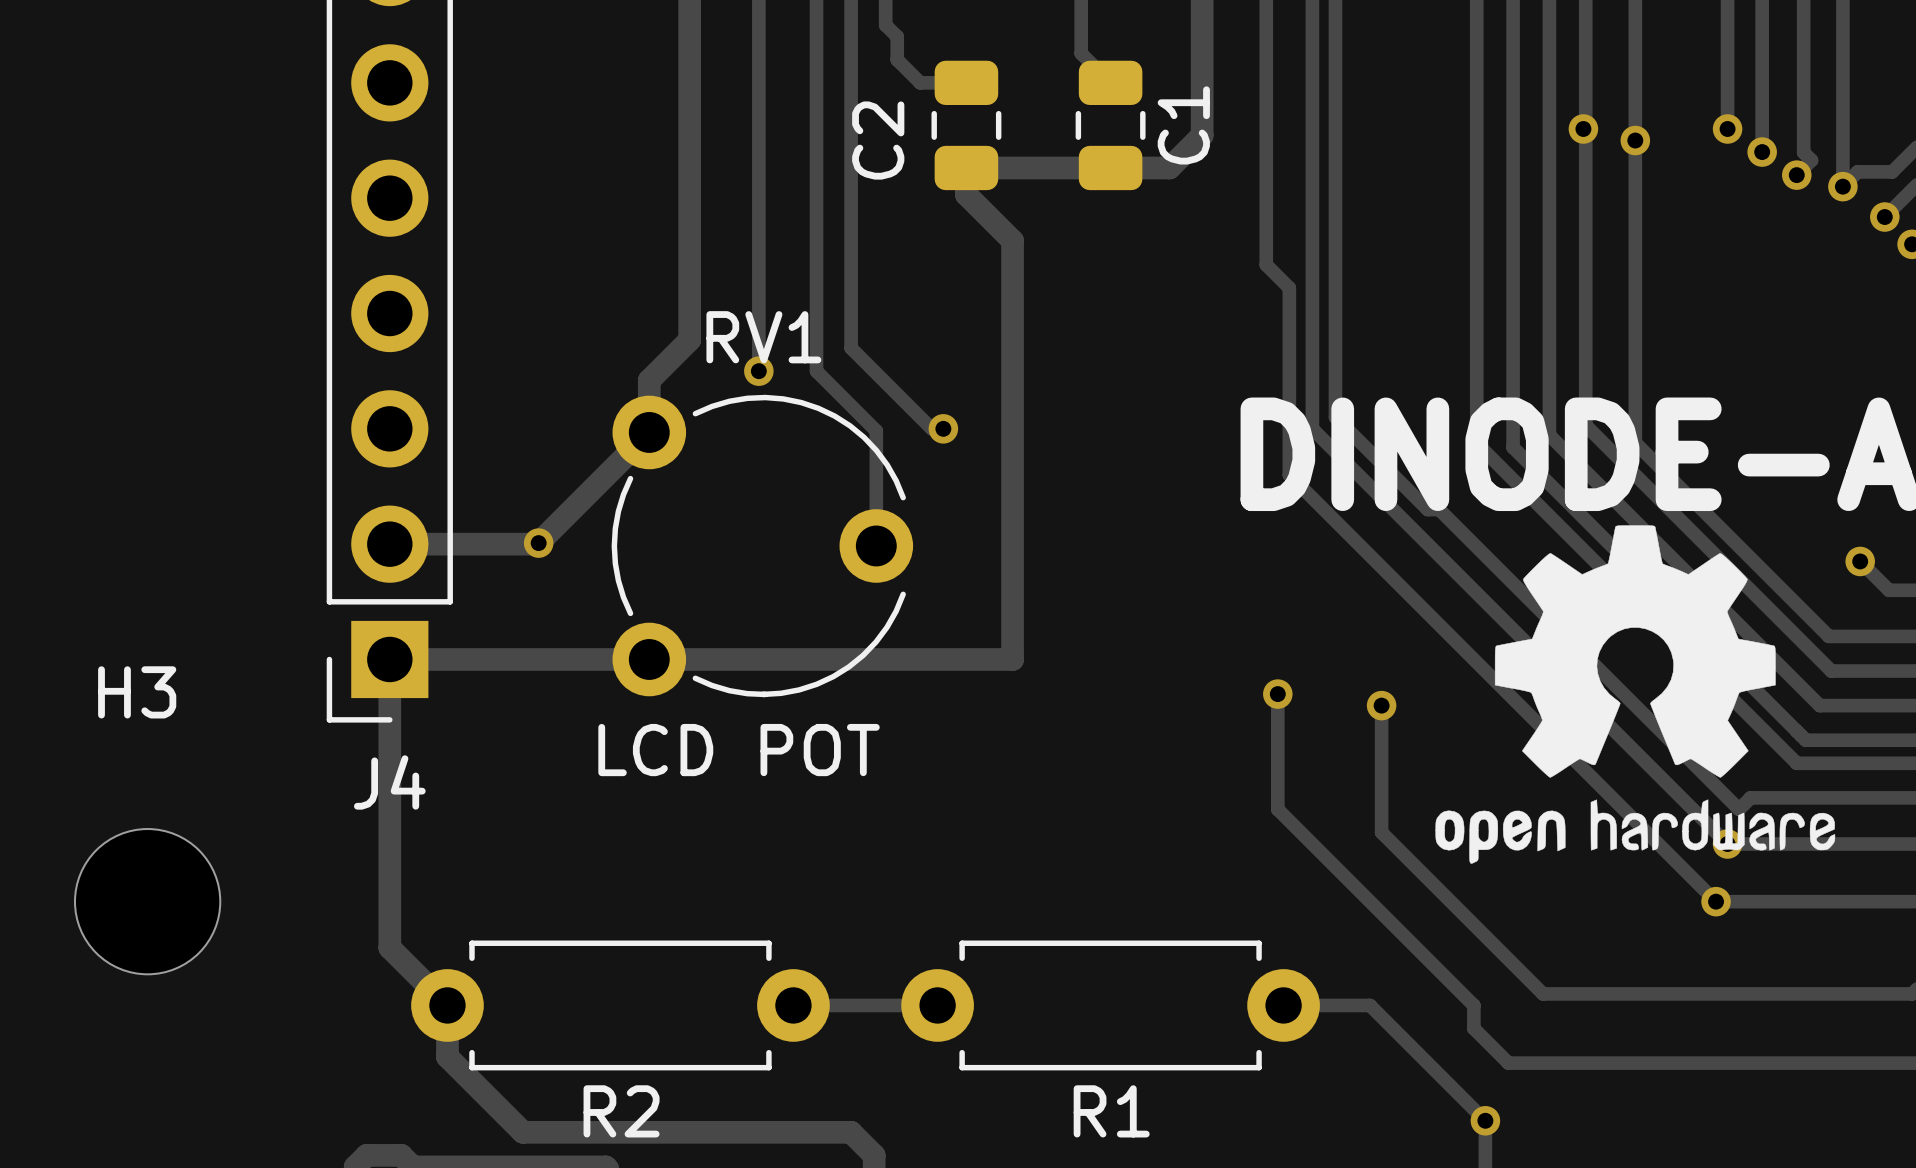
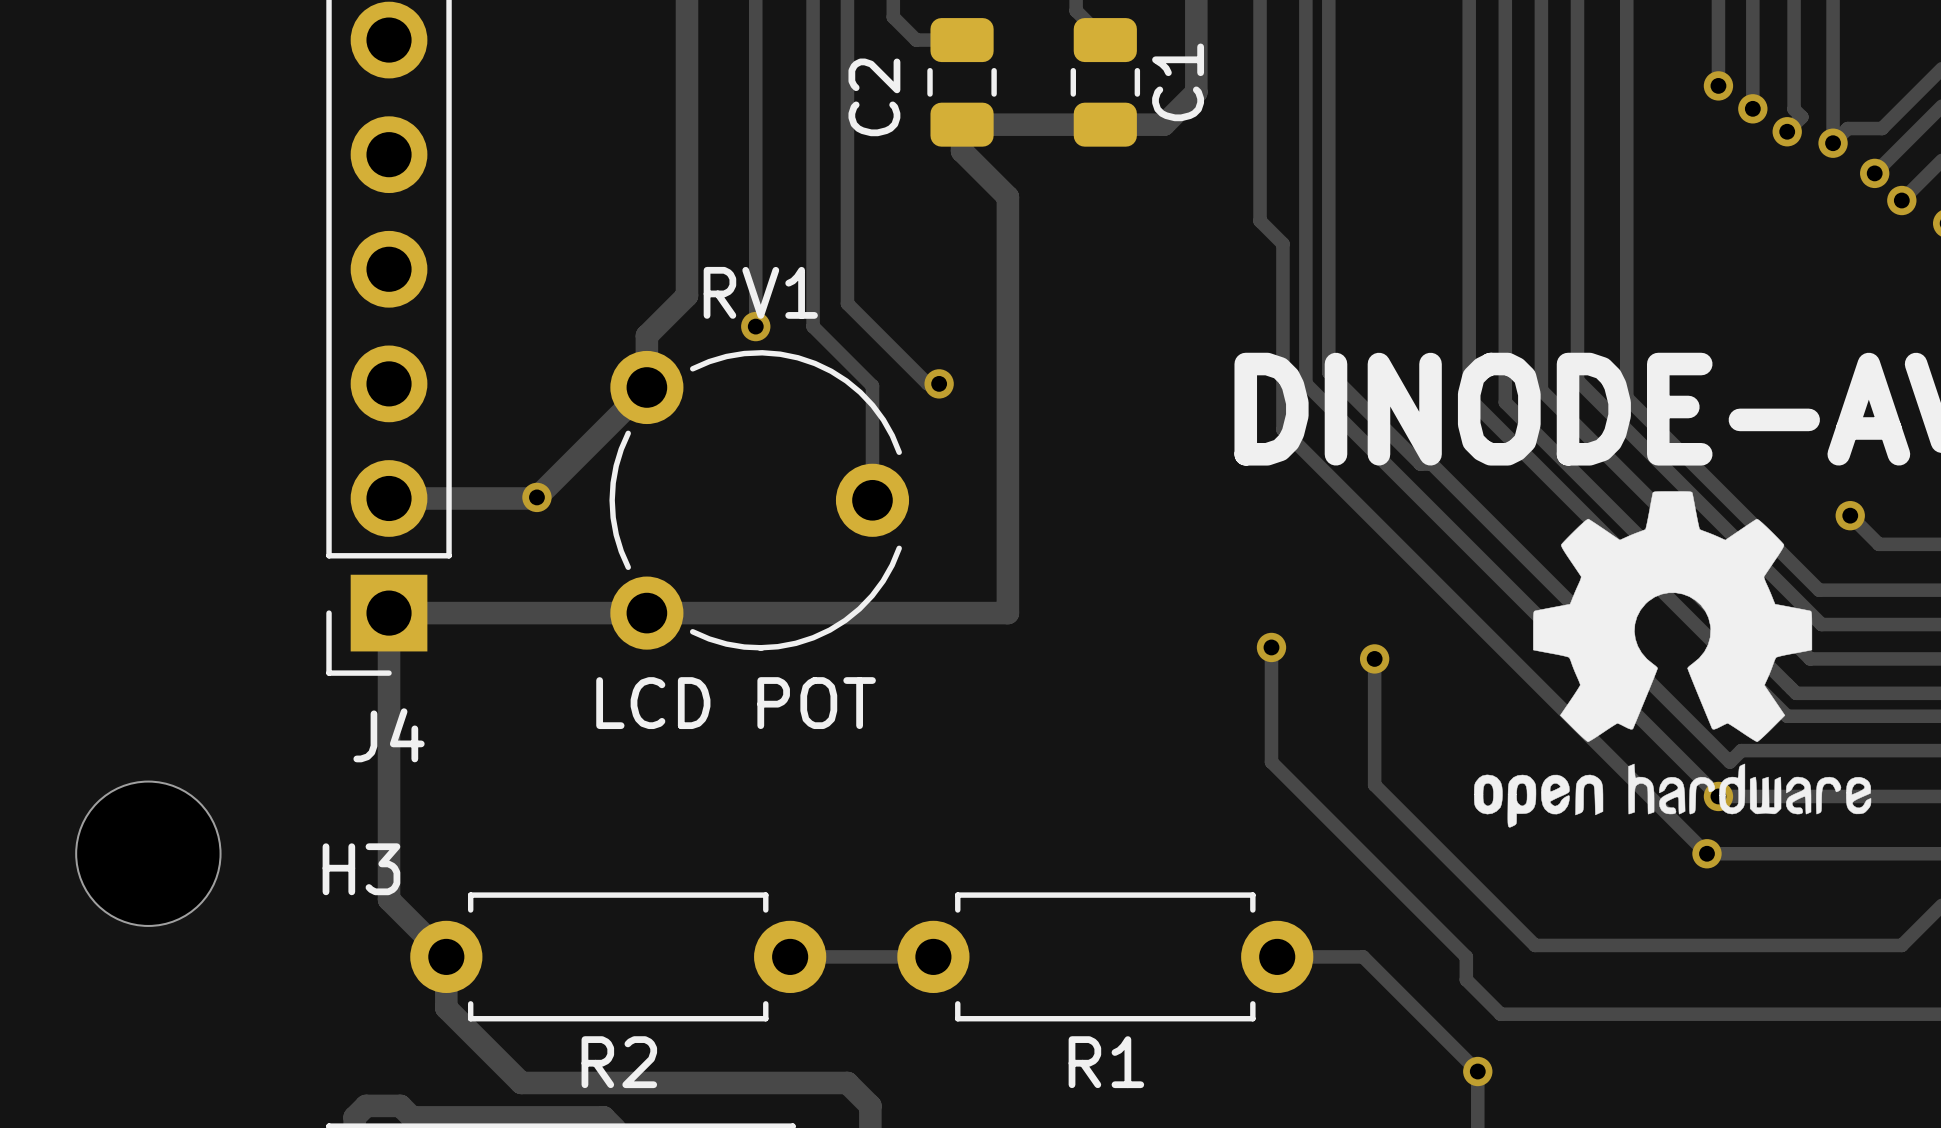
via: (1583, 128) -> none
via: (1635, 140) -> none
H3 name position: H3 (137, 692) -> H3 (361, 869)
drawing position: (1635, 694) -> (1672, 659)

